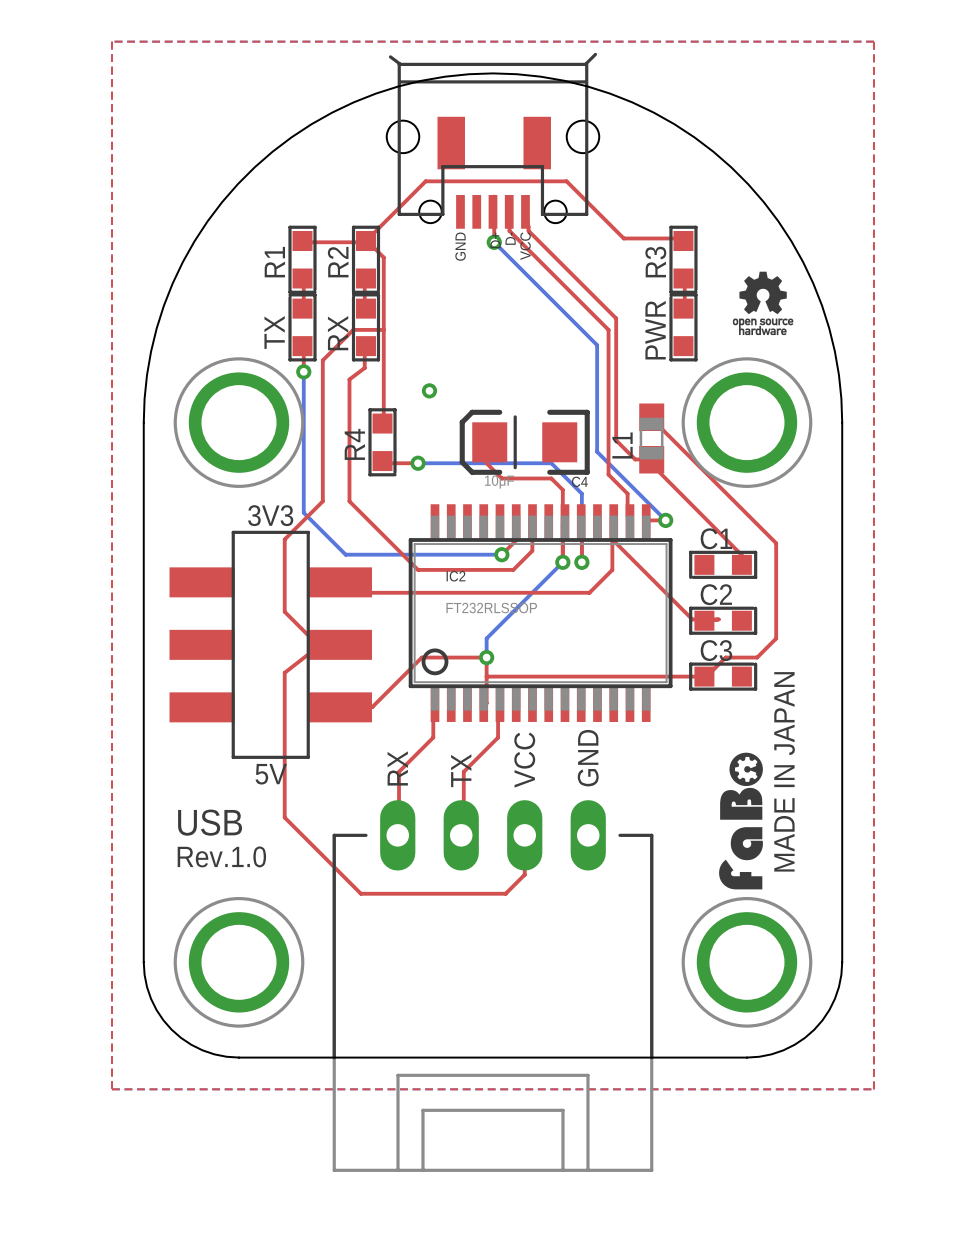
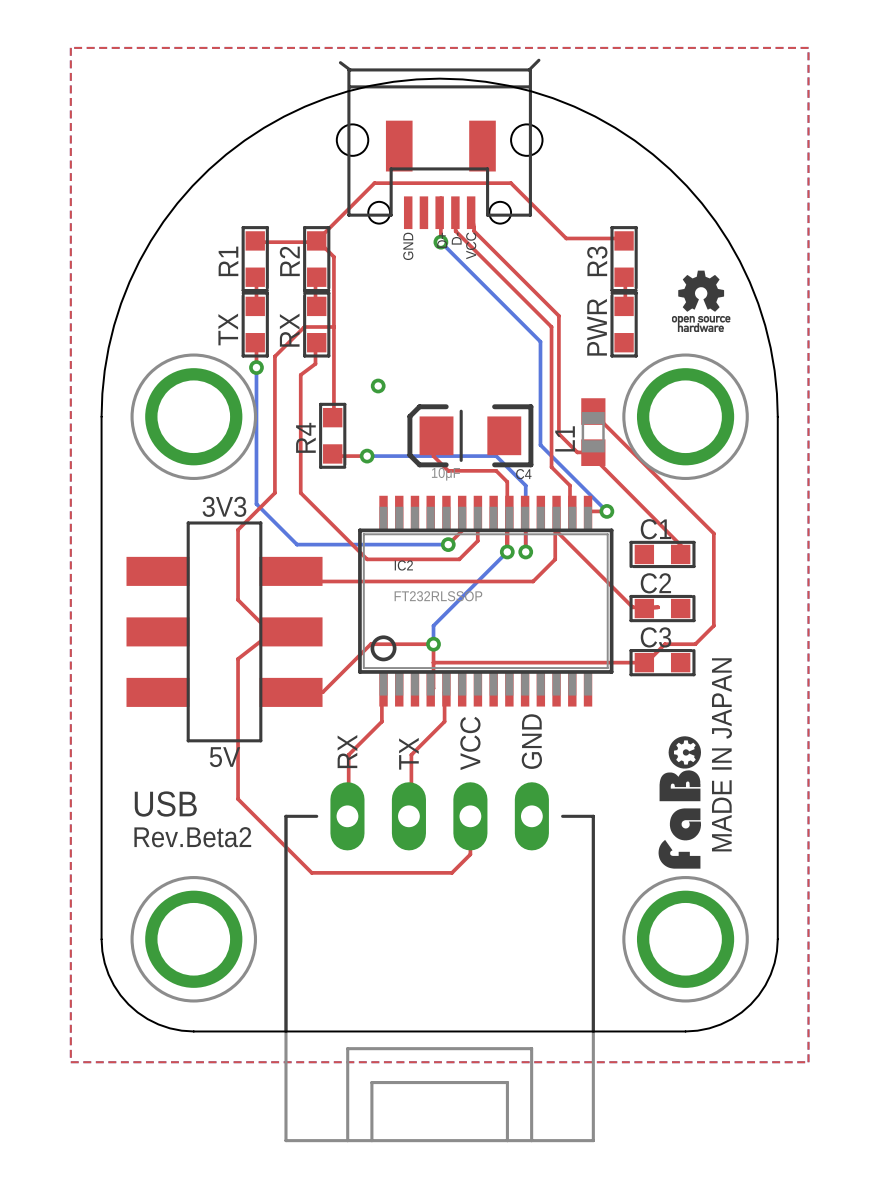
text: Rev.1.0 (221, 856) -> Rev.Beta2 (192, 837)

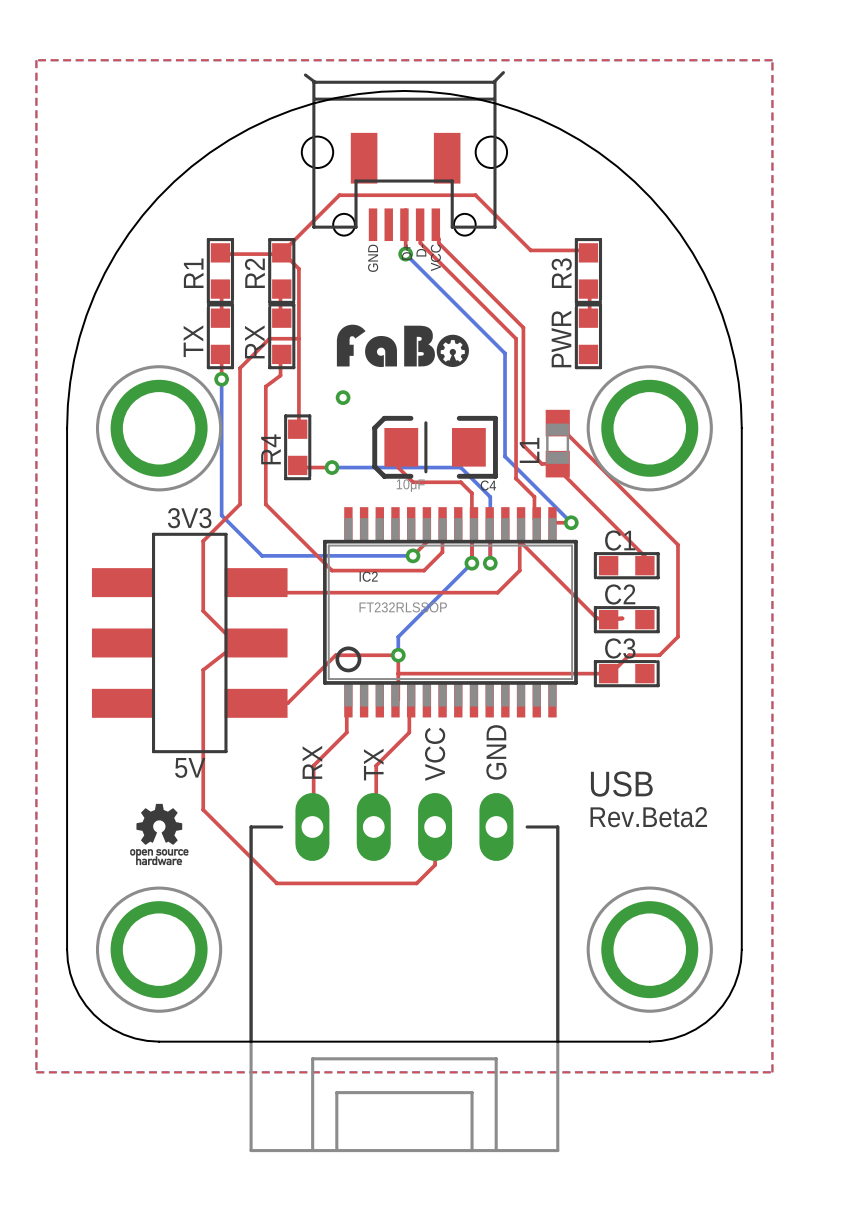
drawing: [671, 270, 731, 332] -> none
drawing: none -> [336, 324, 469, 368]
drawing: [658, 736, 702, 869] -> none
text: MADE IN JAPAN (721, 754) -> none
drawing: none -> [130, 803, 189, 866]
text position: USB (165, 804) -> USB (621, 784)
text position: Rev.Beta2 (192, 837) -> Rev.Beta2 (648, 817)

